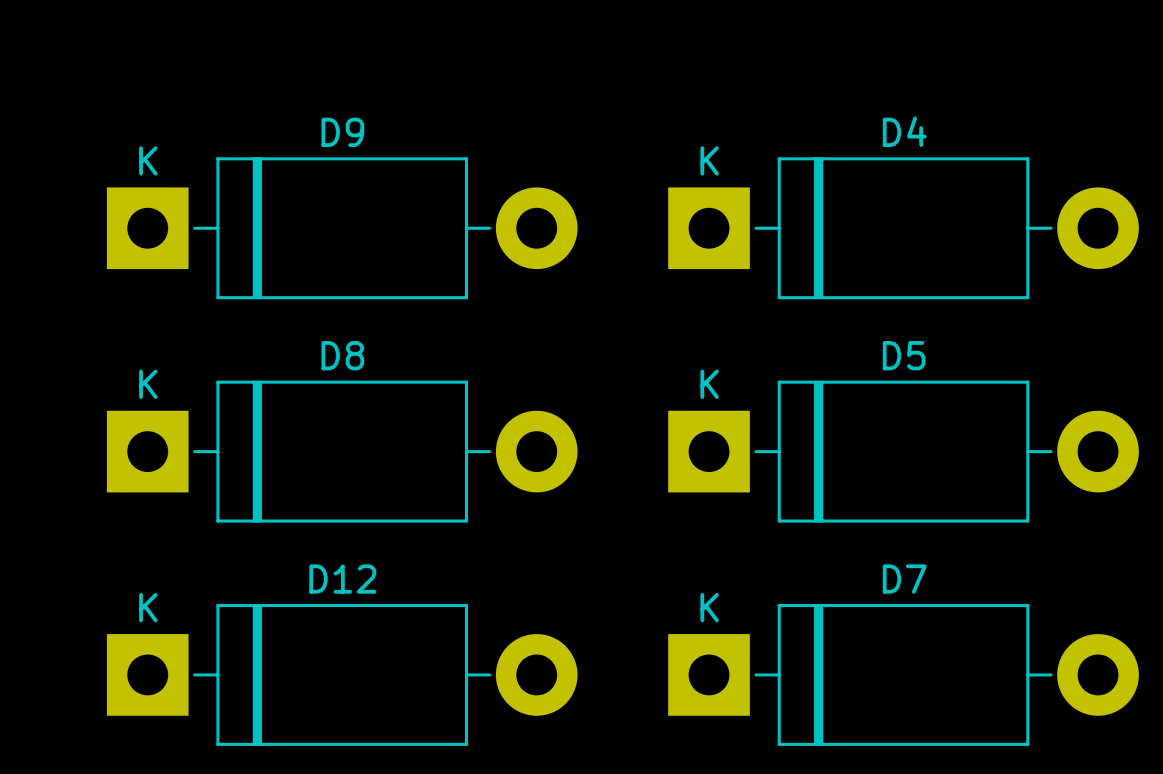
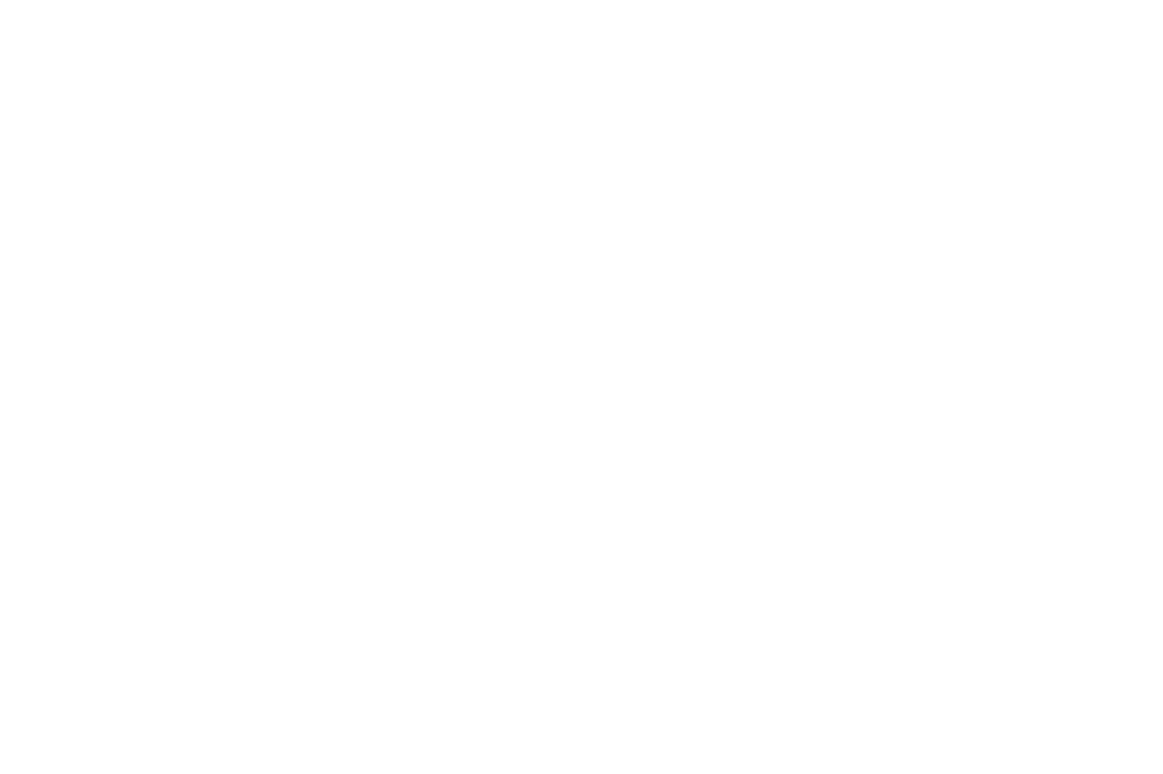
D9: (342, 228) -> none
D4: (903, 228) -> none
D8: (342, 451) -> none
D5: (903, 451) -> none
D12: (342, 674) -> none
D7: (903, 674) -> none

